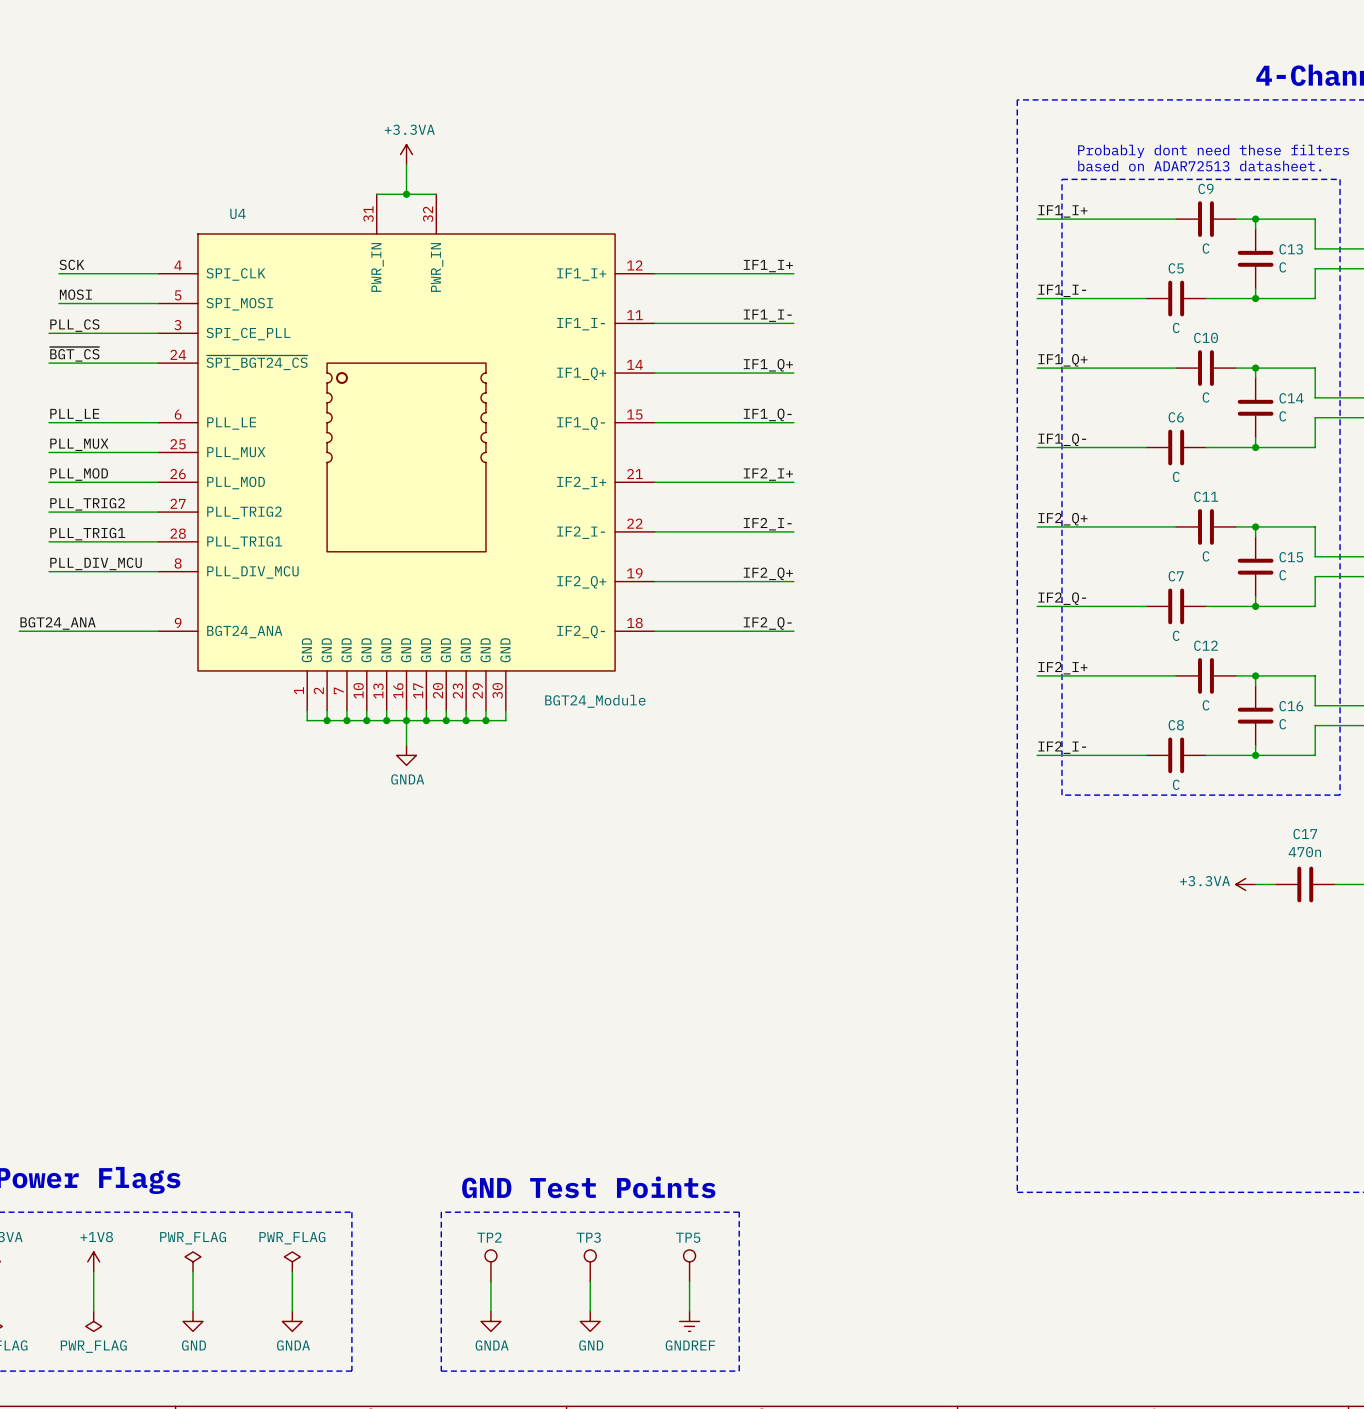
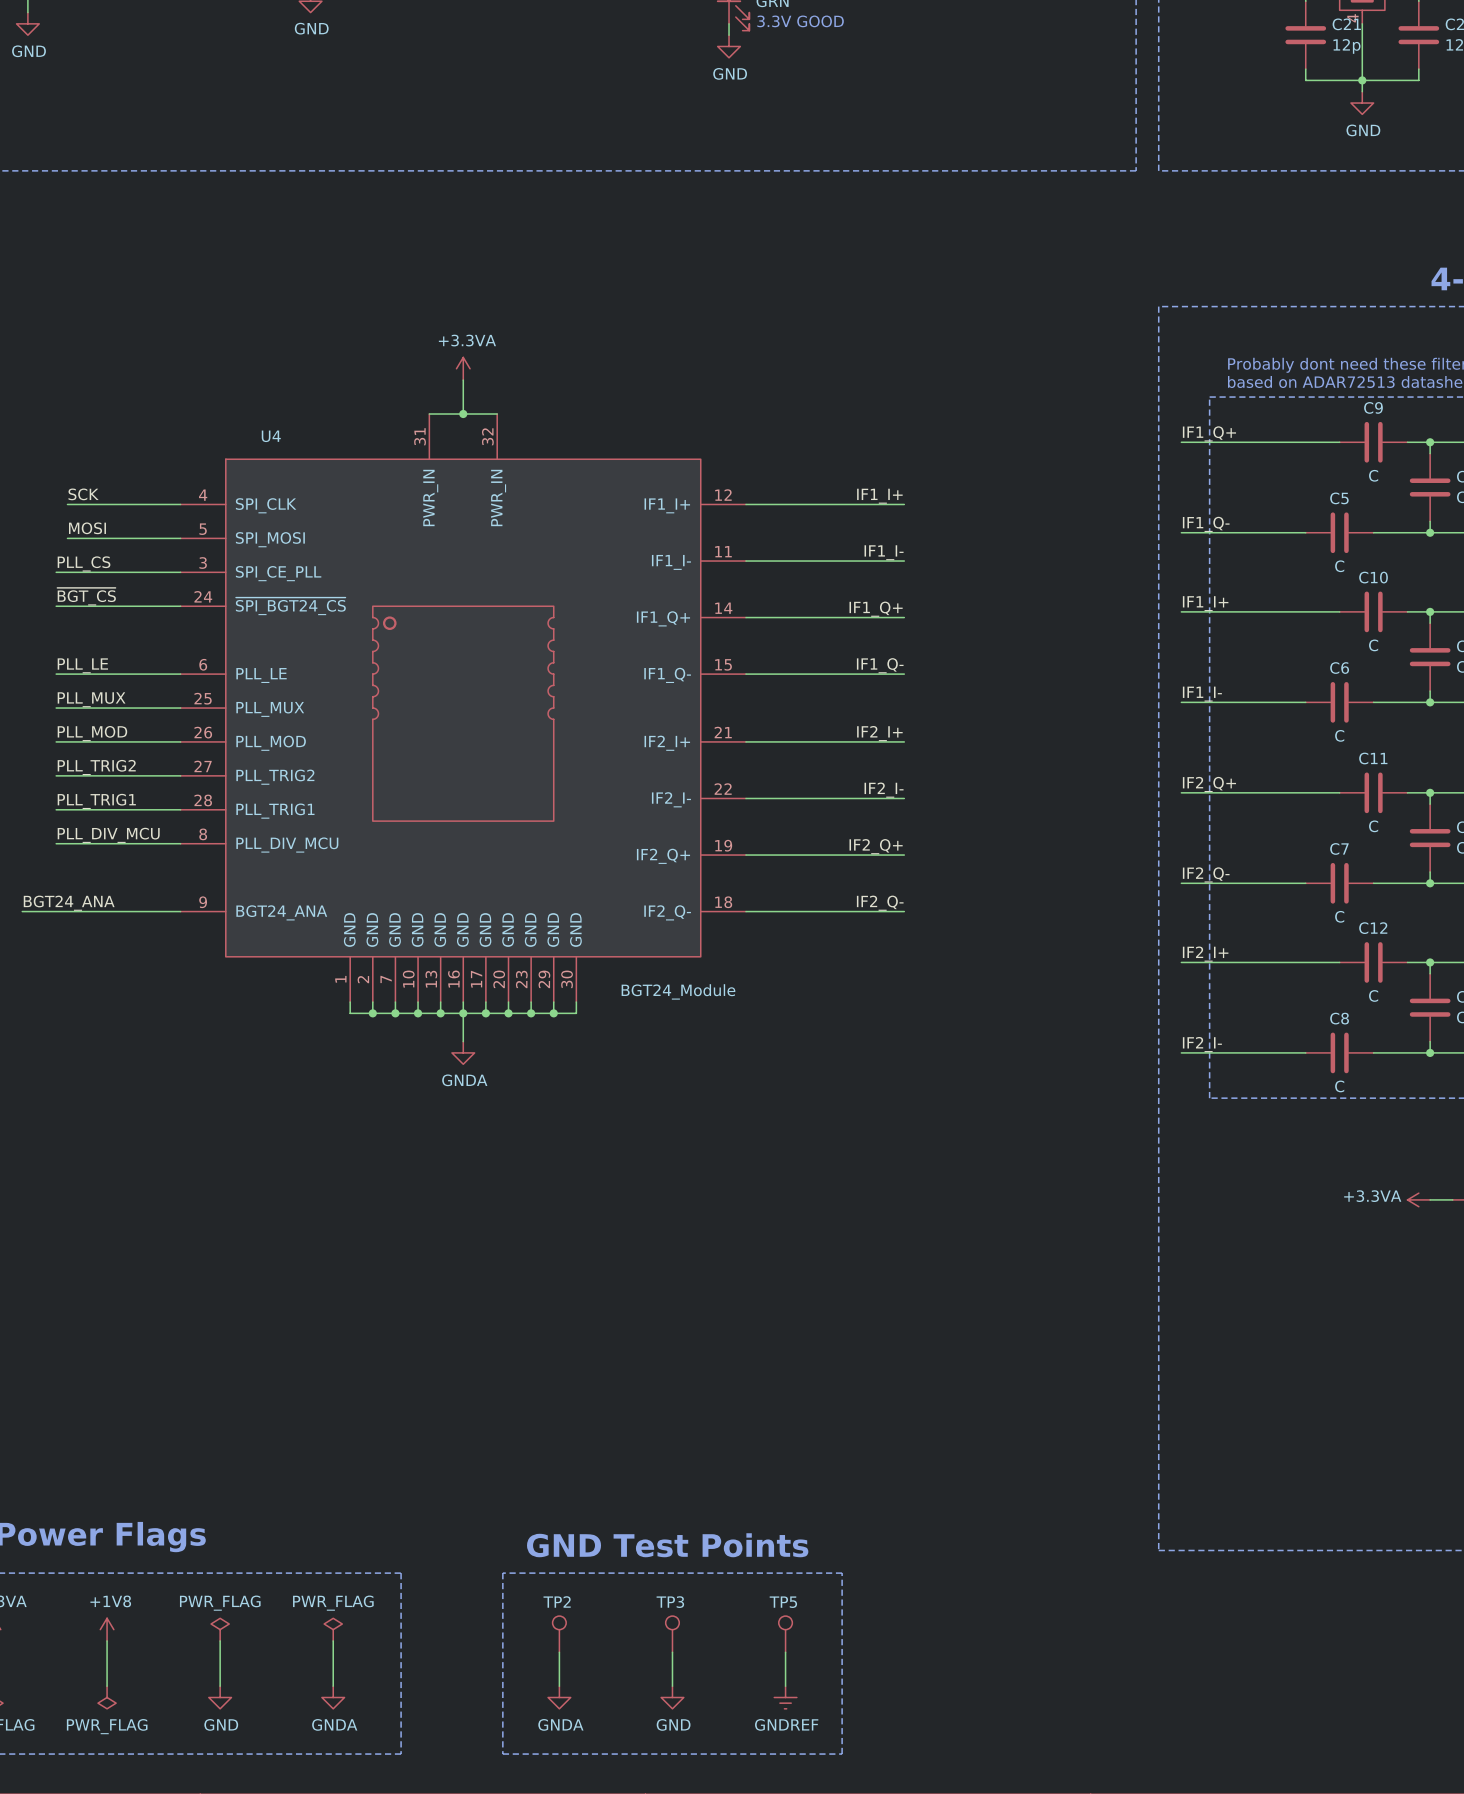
label: IF1_I+ (1062, 211) -> IF1_Q+ (1209, 433)
label: IF1_I- (1062, 290) -> IF1_Q- (1206, 524)
label: IF1_Q+ (1062, 360) -> IF1_I+ (1205, 603)
label: IF1_Q- (1062, 439) -> IF1_I- (1202, 694)

